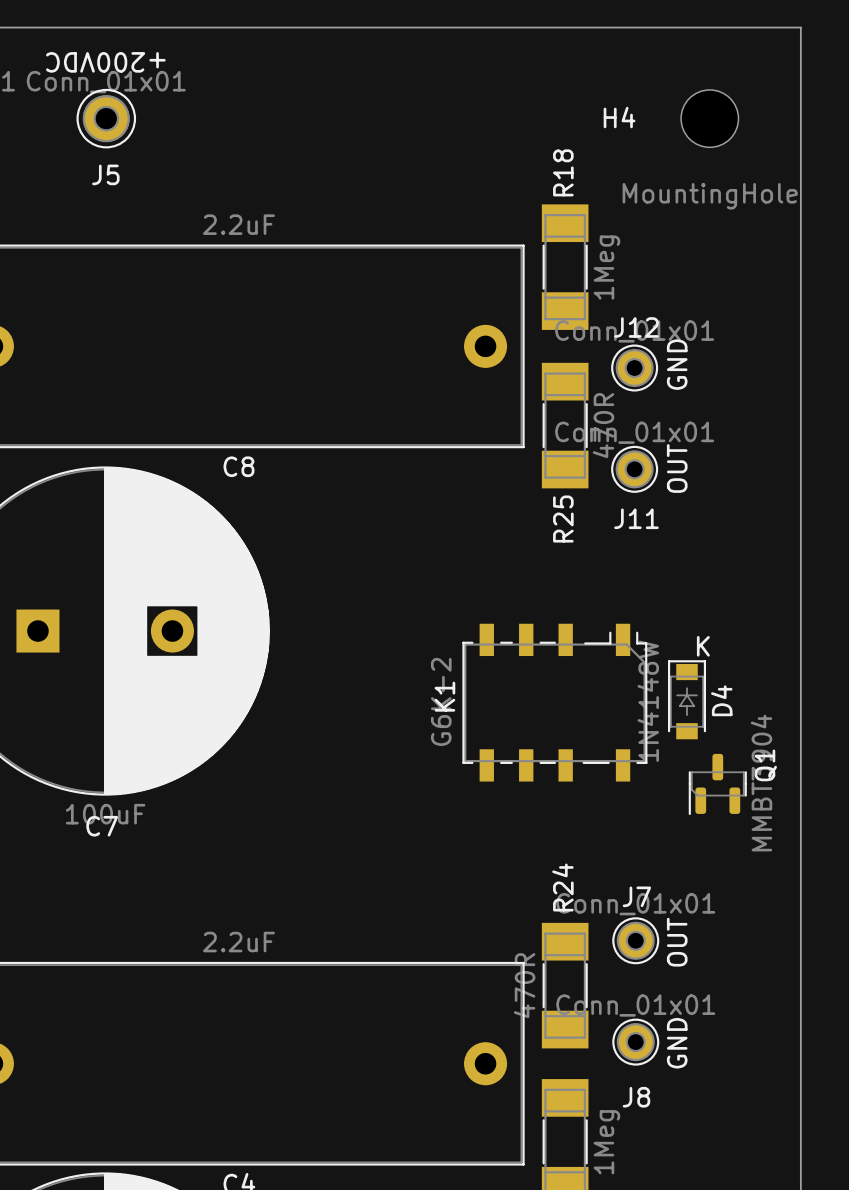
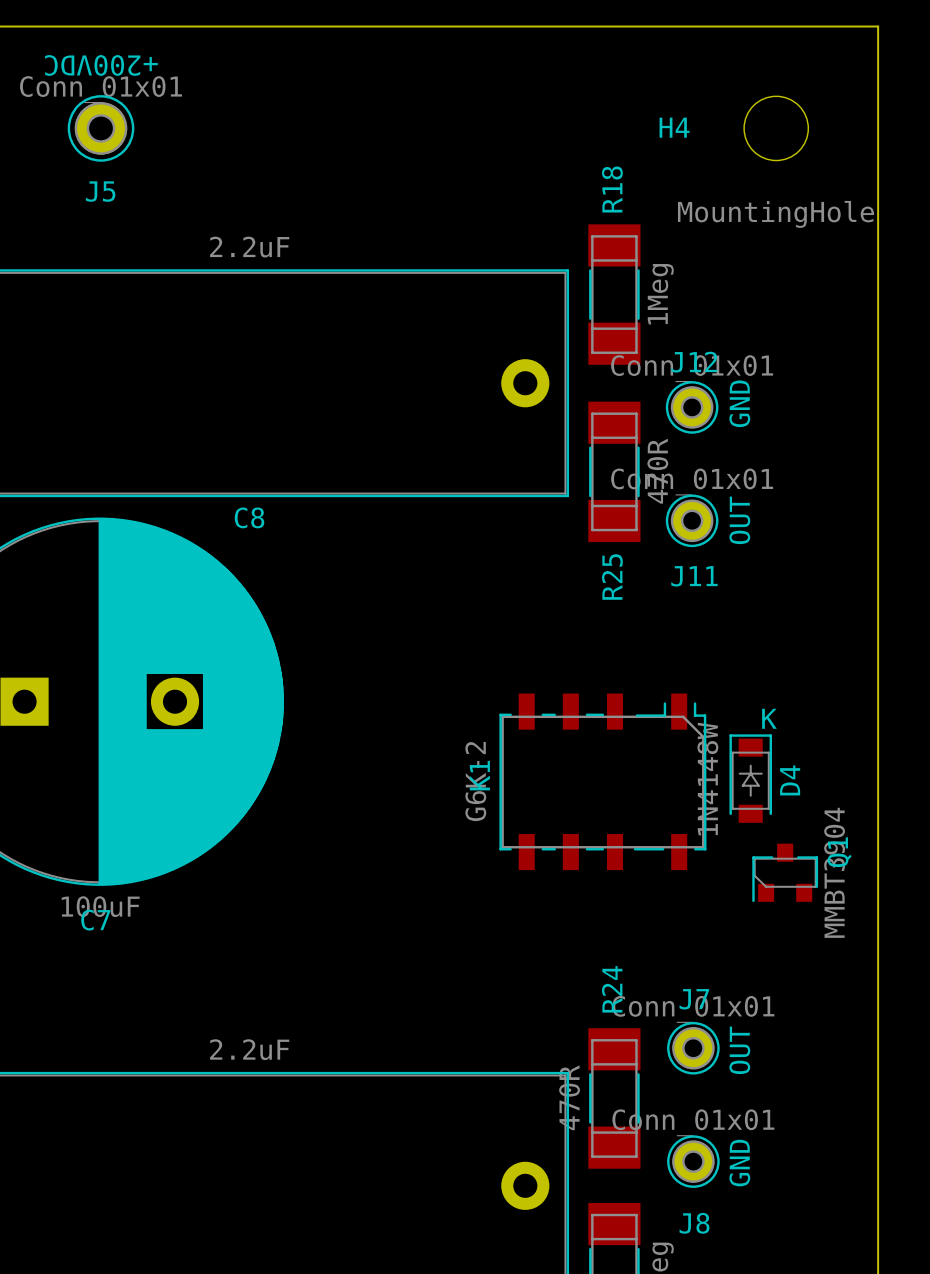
Q1 footprint: [688, 753, 747, 816] -> [752, 843, 819, 903]

